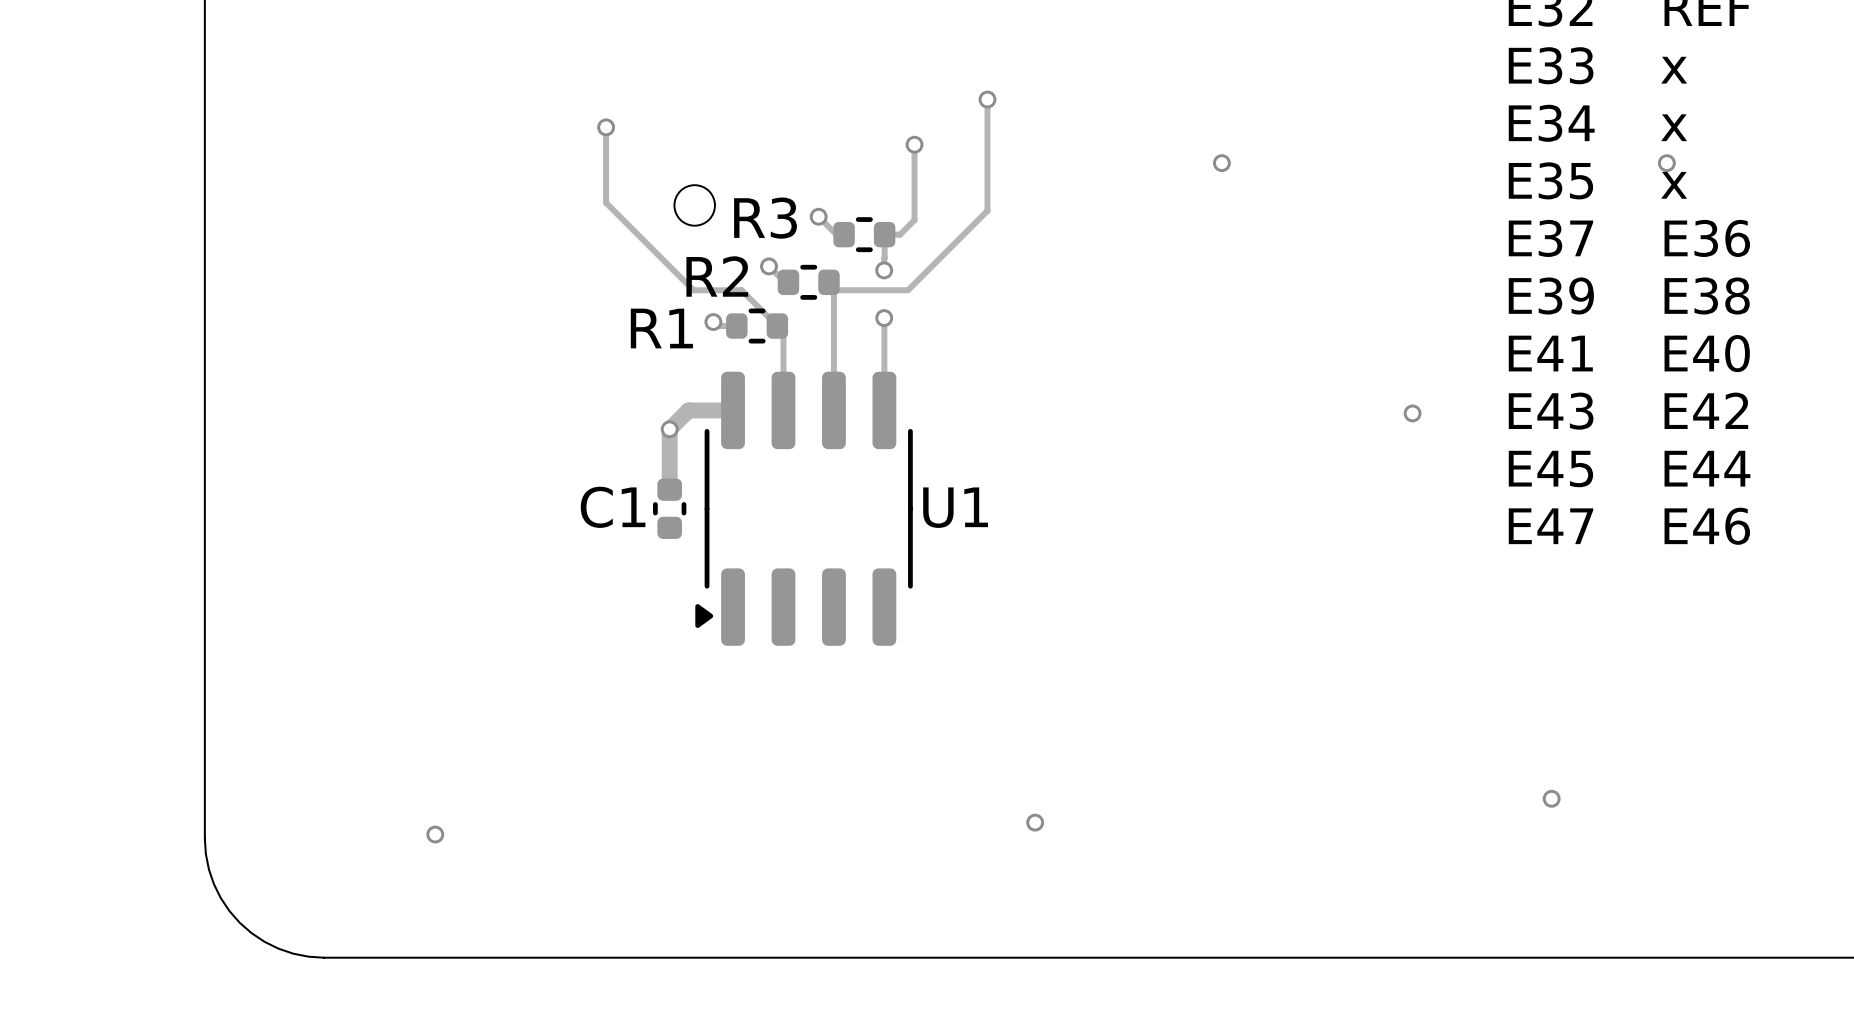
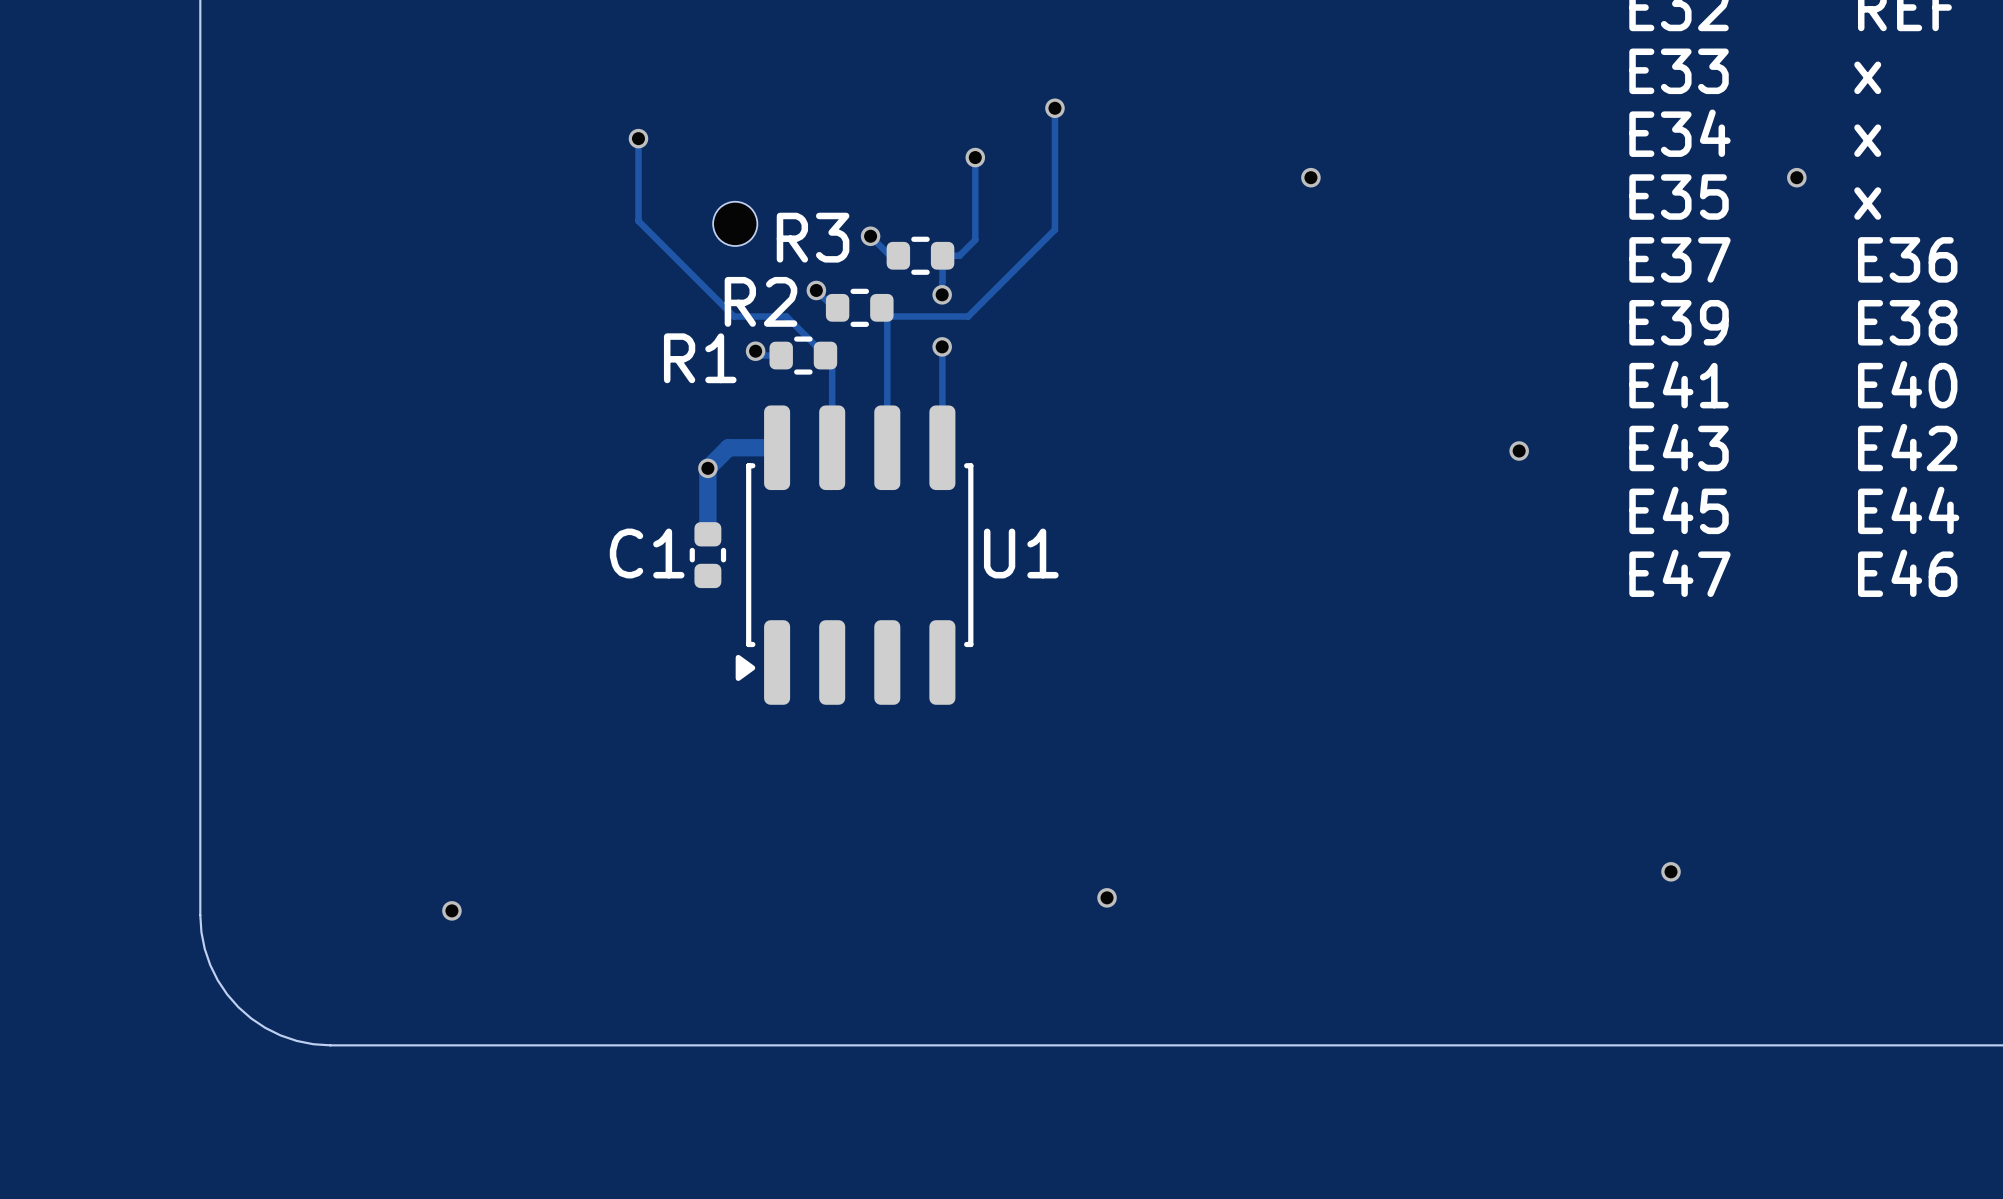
U1 footprint: [695, 371, 913, 646] -> [735, 405, 974, 705]

